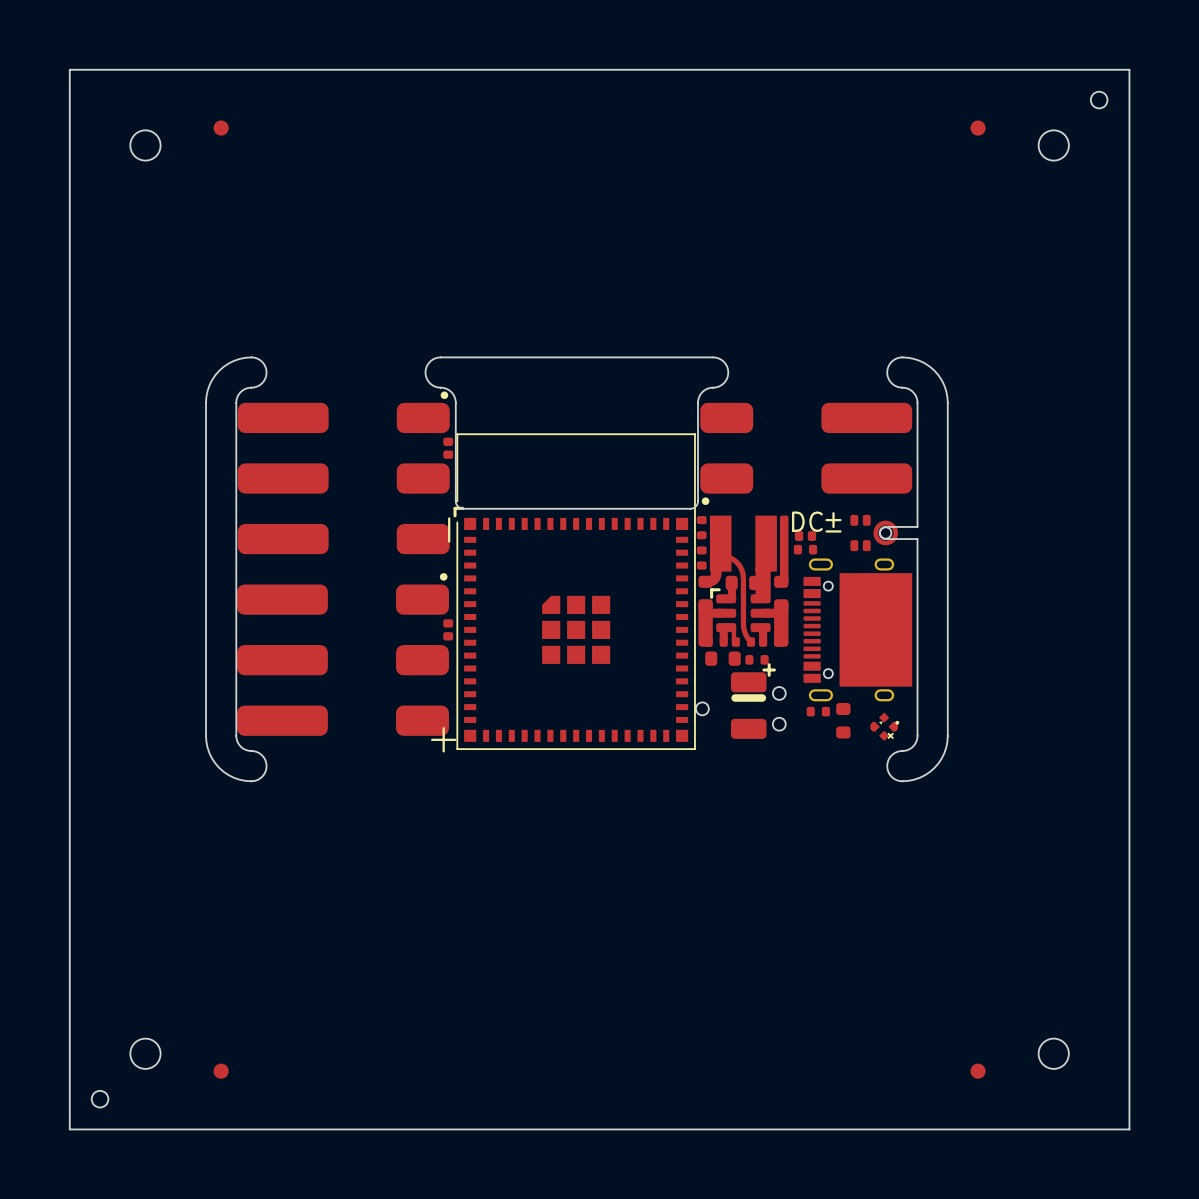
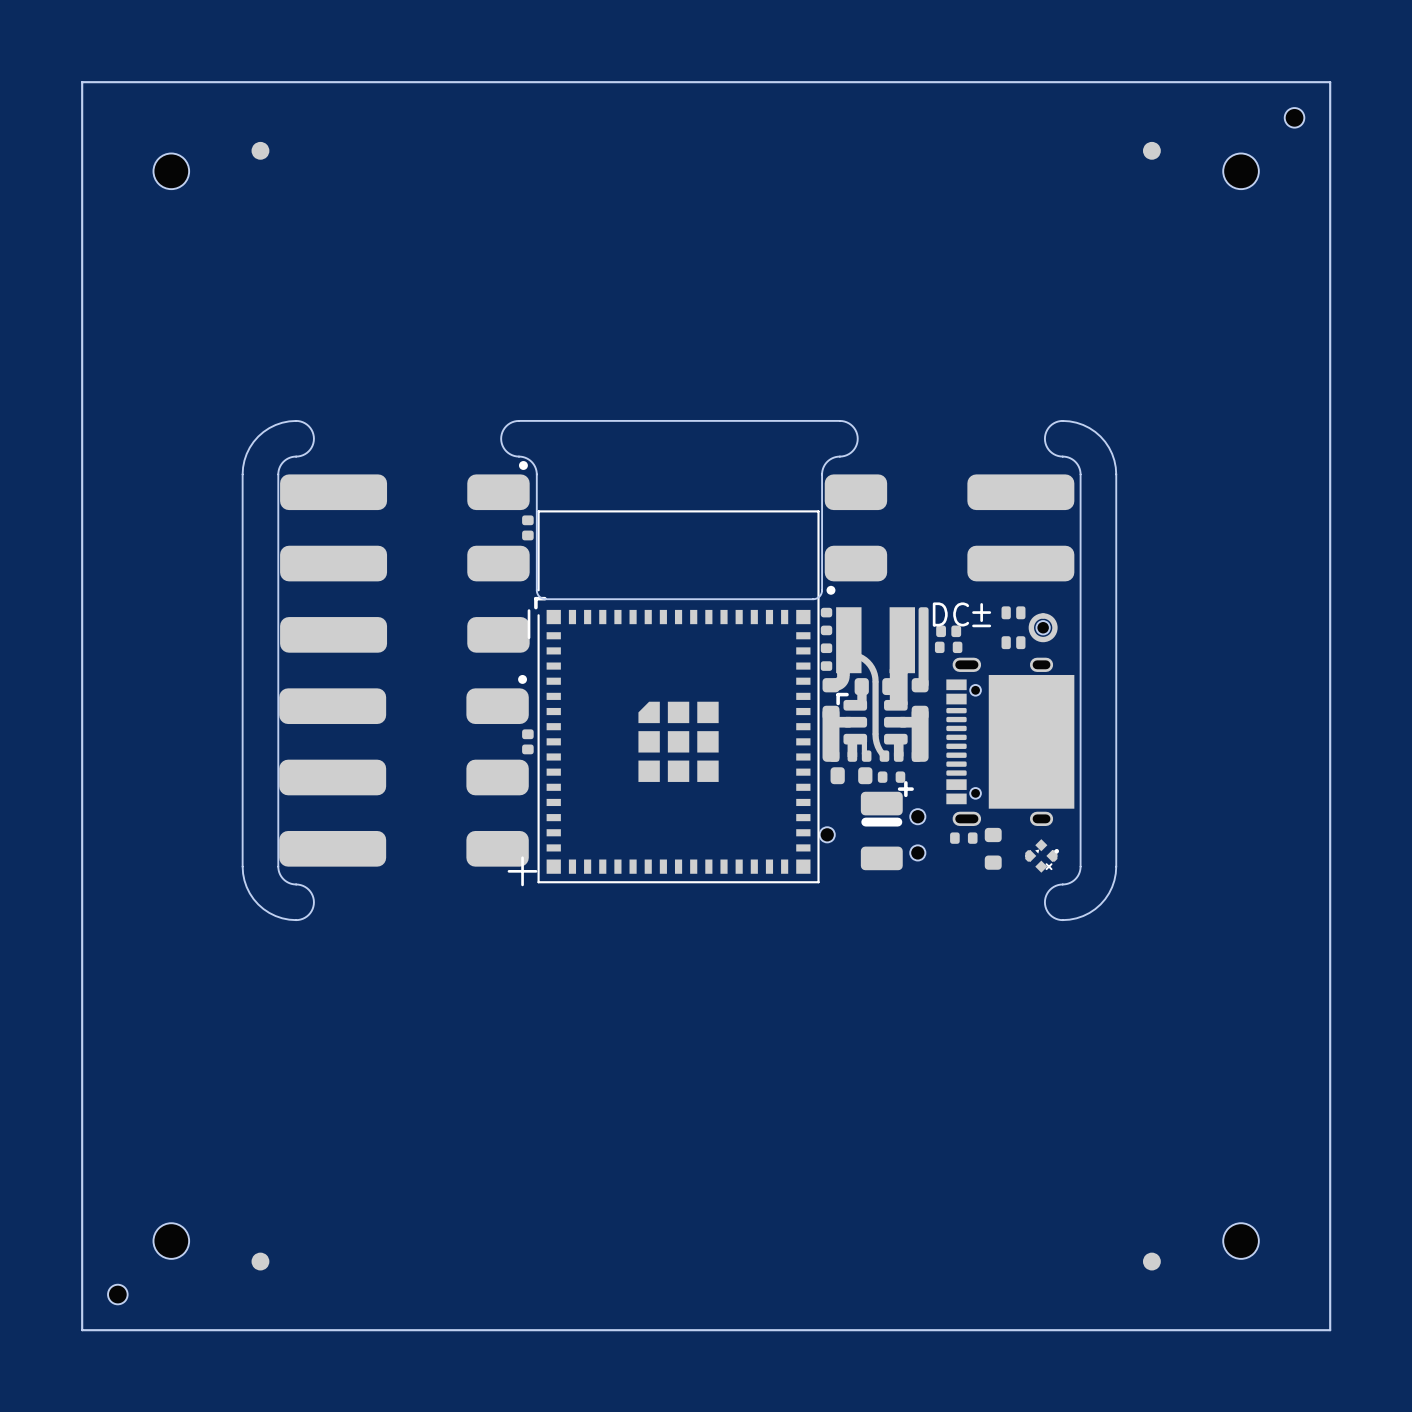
board edge: (917, 526) (884, 526) (881, 528) (879, 533) (881, 537) (884, 539) (917, 539) -> (1080, 620) (1080, 634)

